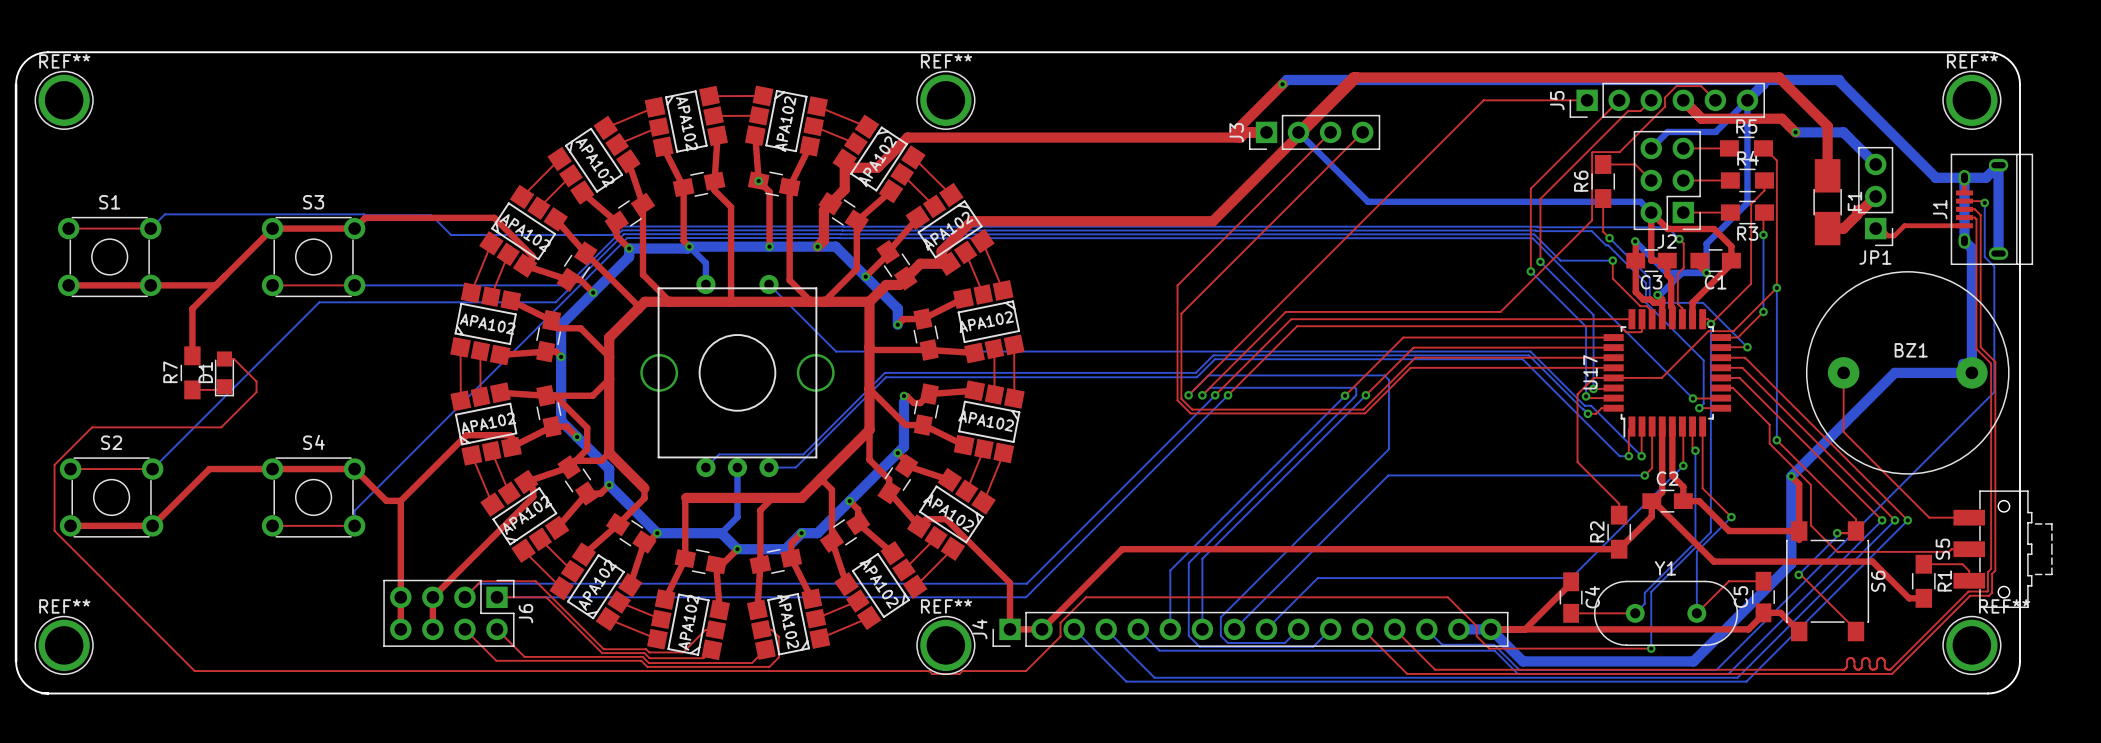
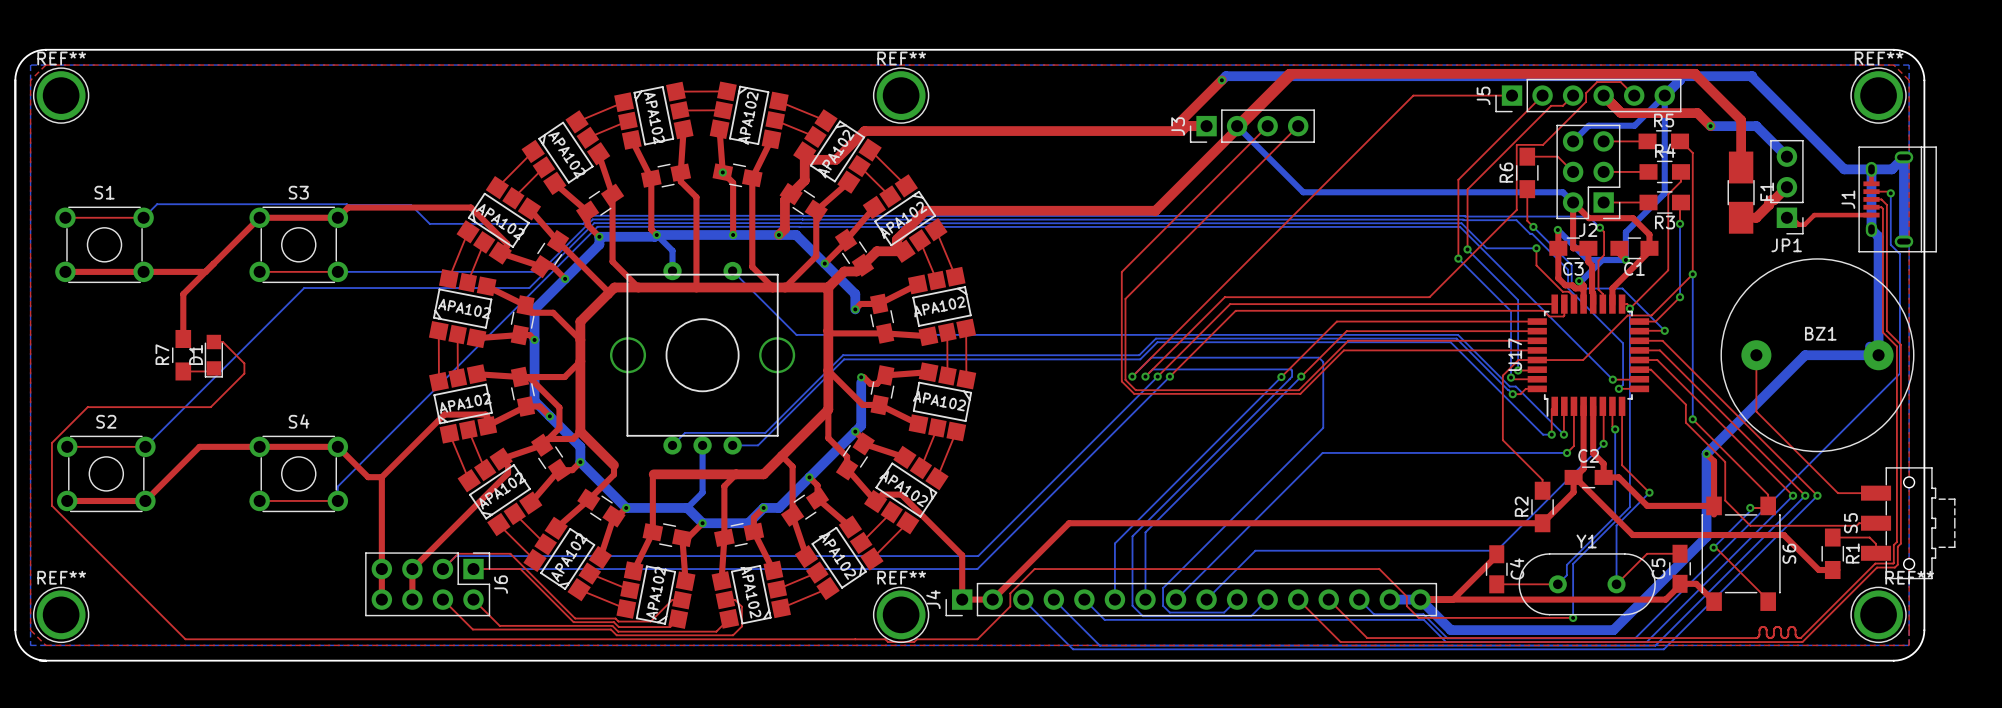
bottom zone outline: none -> (30, 65) (30, 645) (1909, 645) (1909, 65) (30, 65)
top zone outline: none -> (45, 65) (1893, 65) (1909, 80) (1909, 645) (45, 645) (30, 630) (30, 80) (45, 65)

